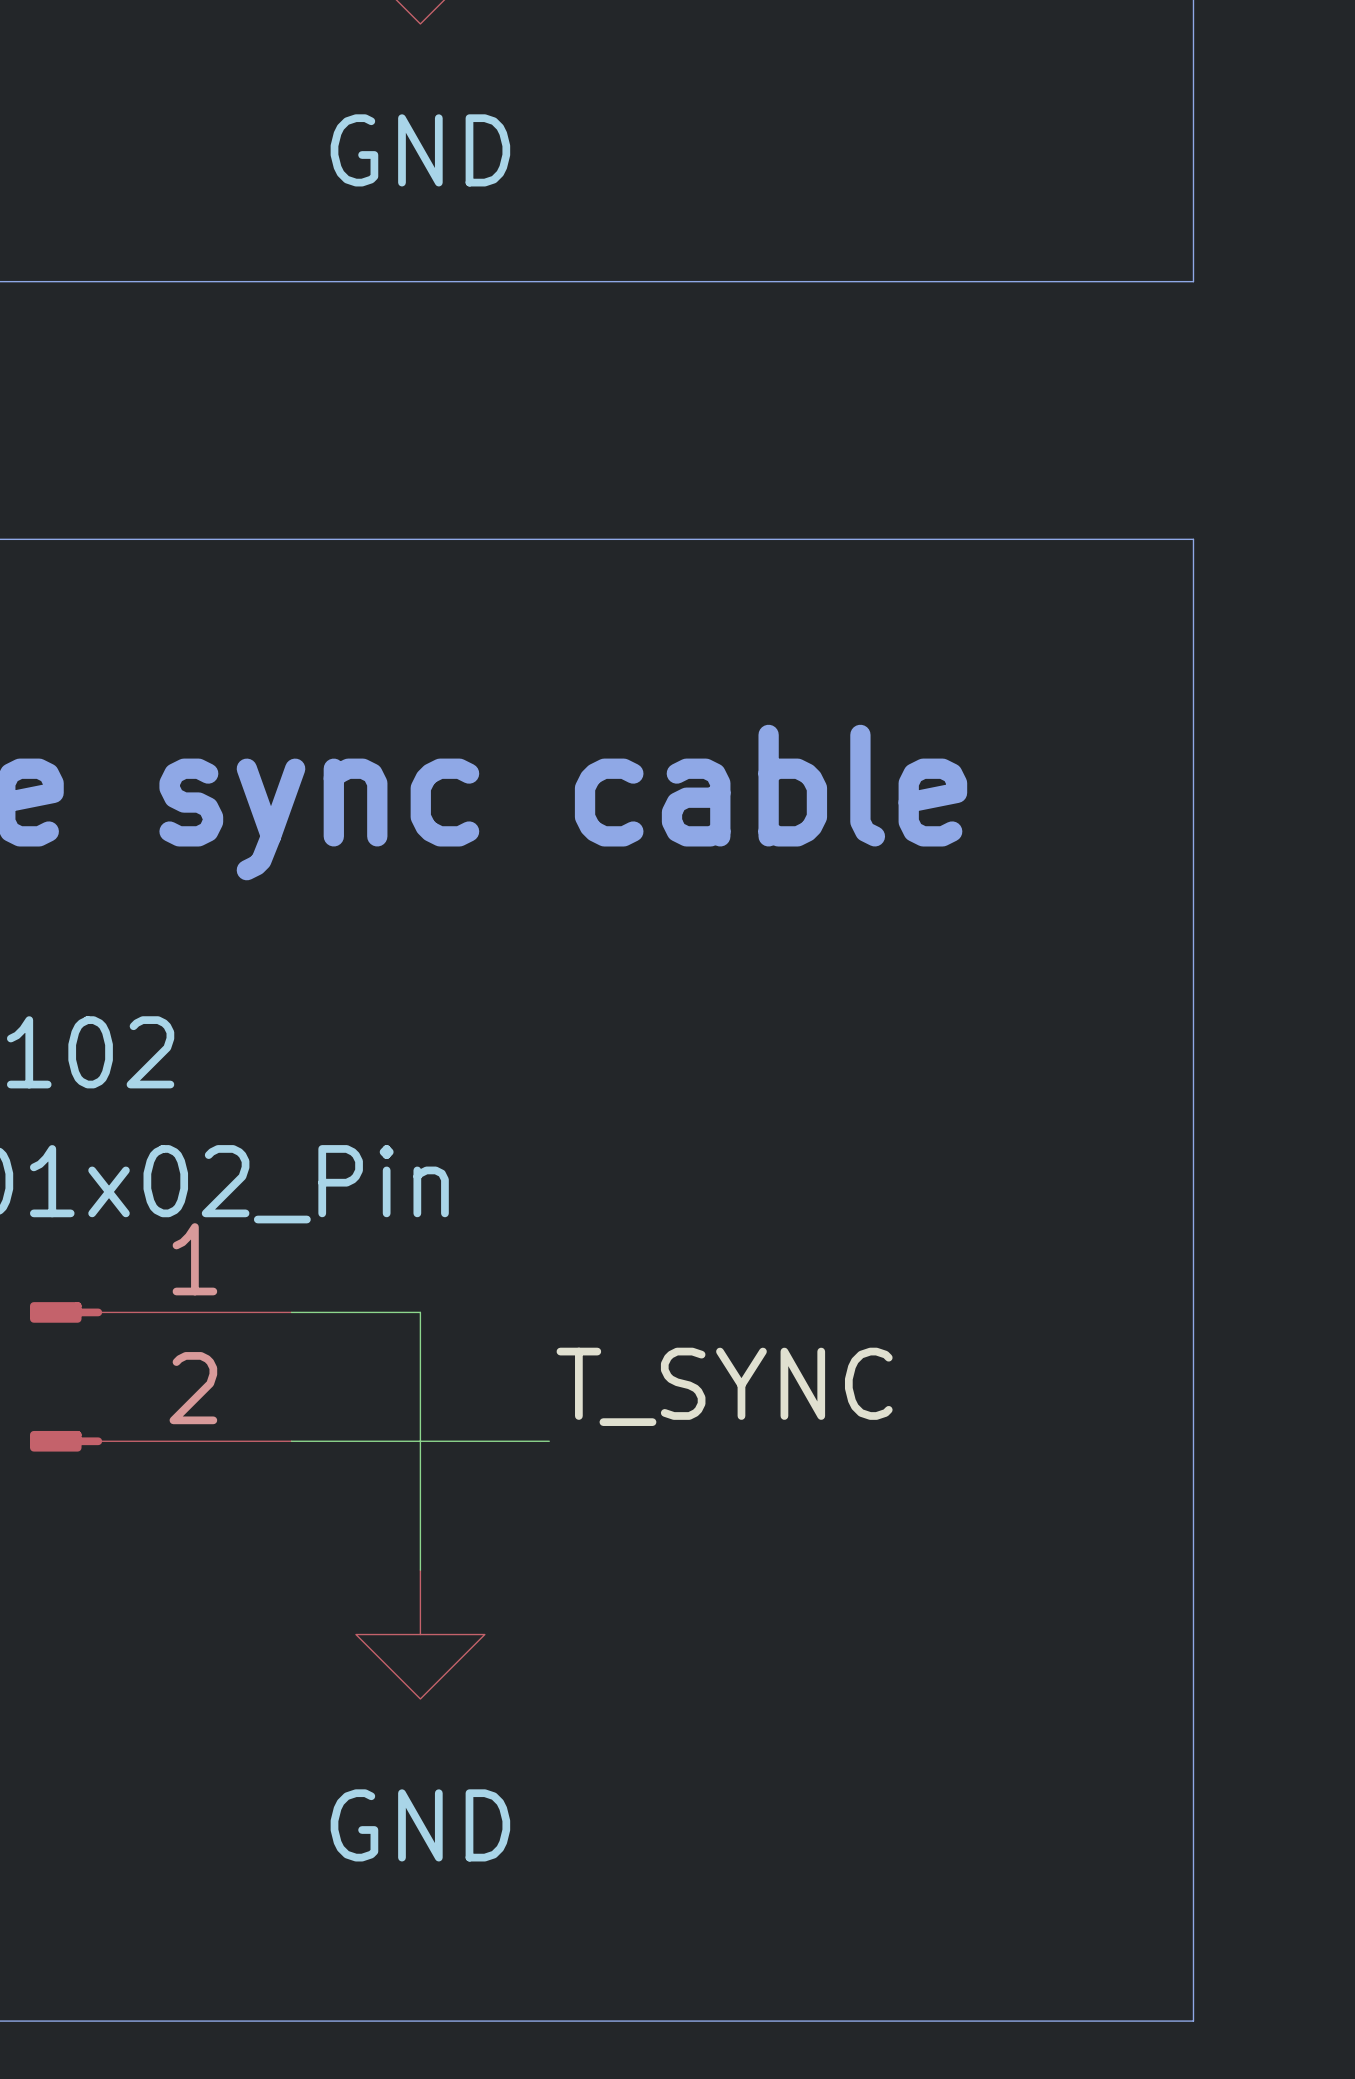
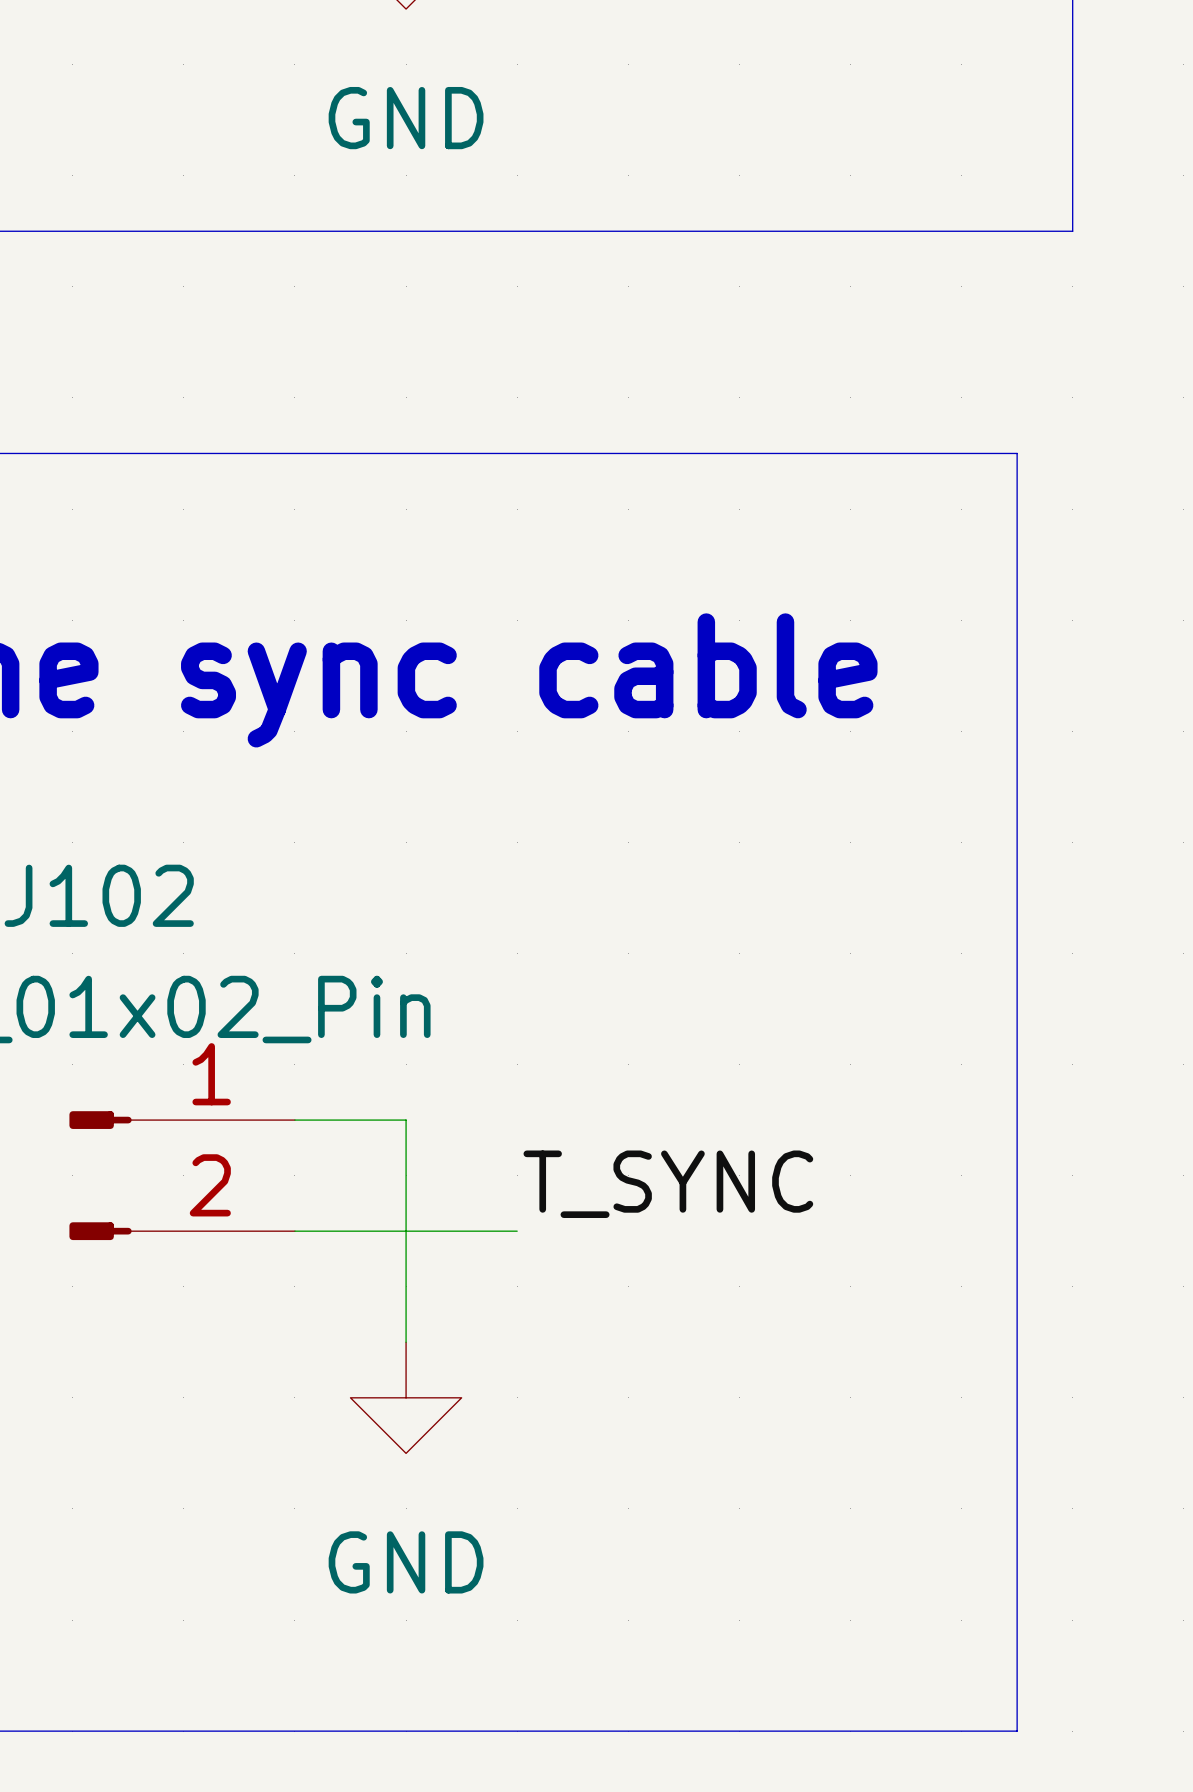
line: (1129, 539) (1193, 539) (1193, 2021) (1129, 2021) -> (1017, 453) (1017, 1731)

